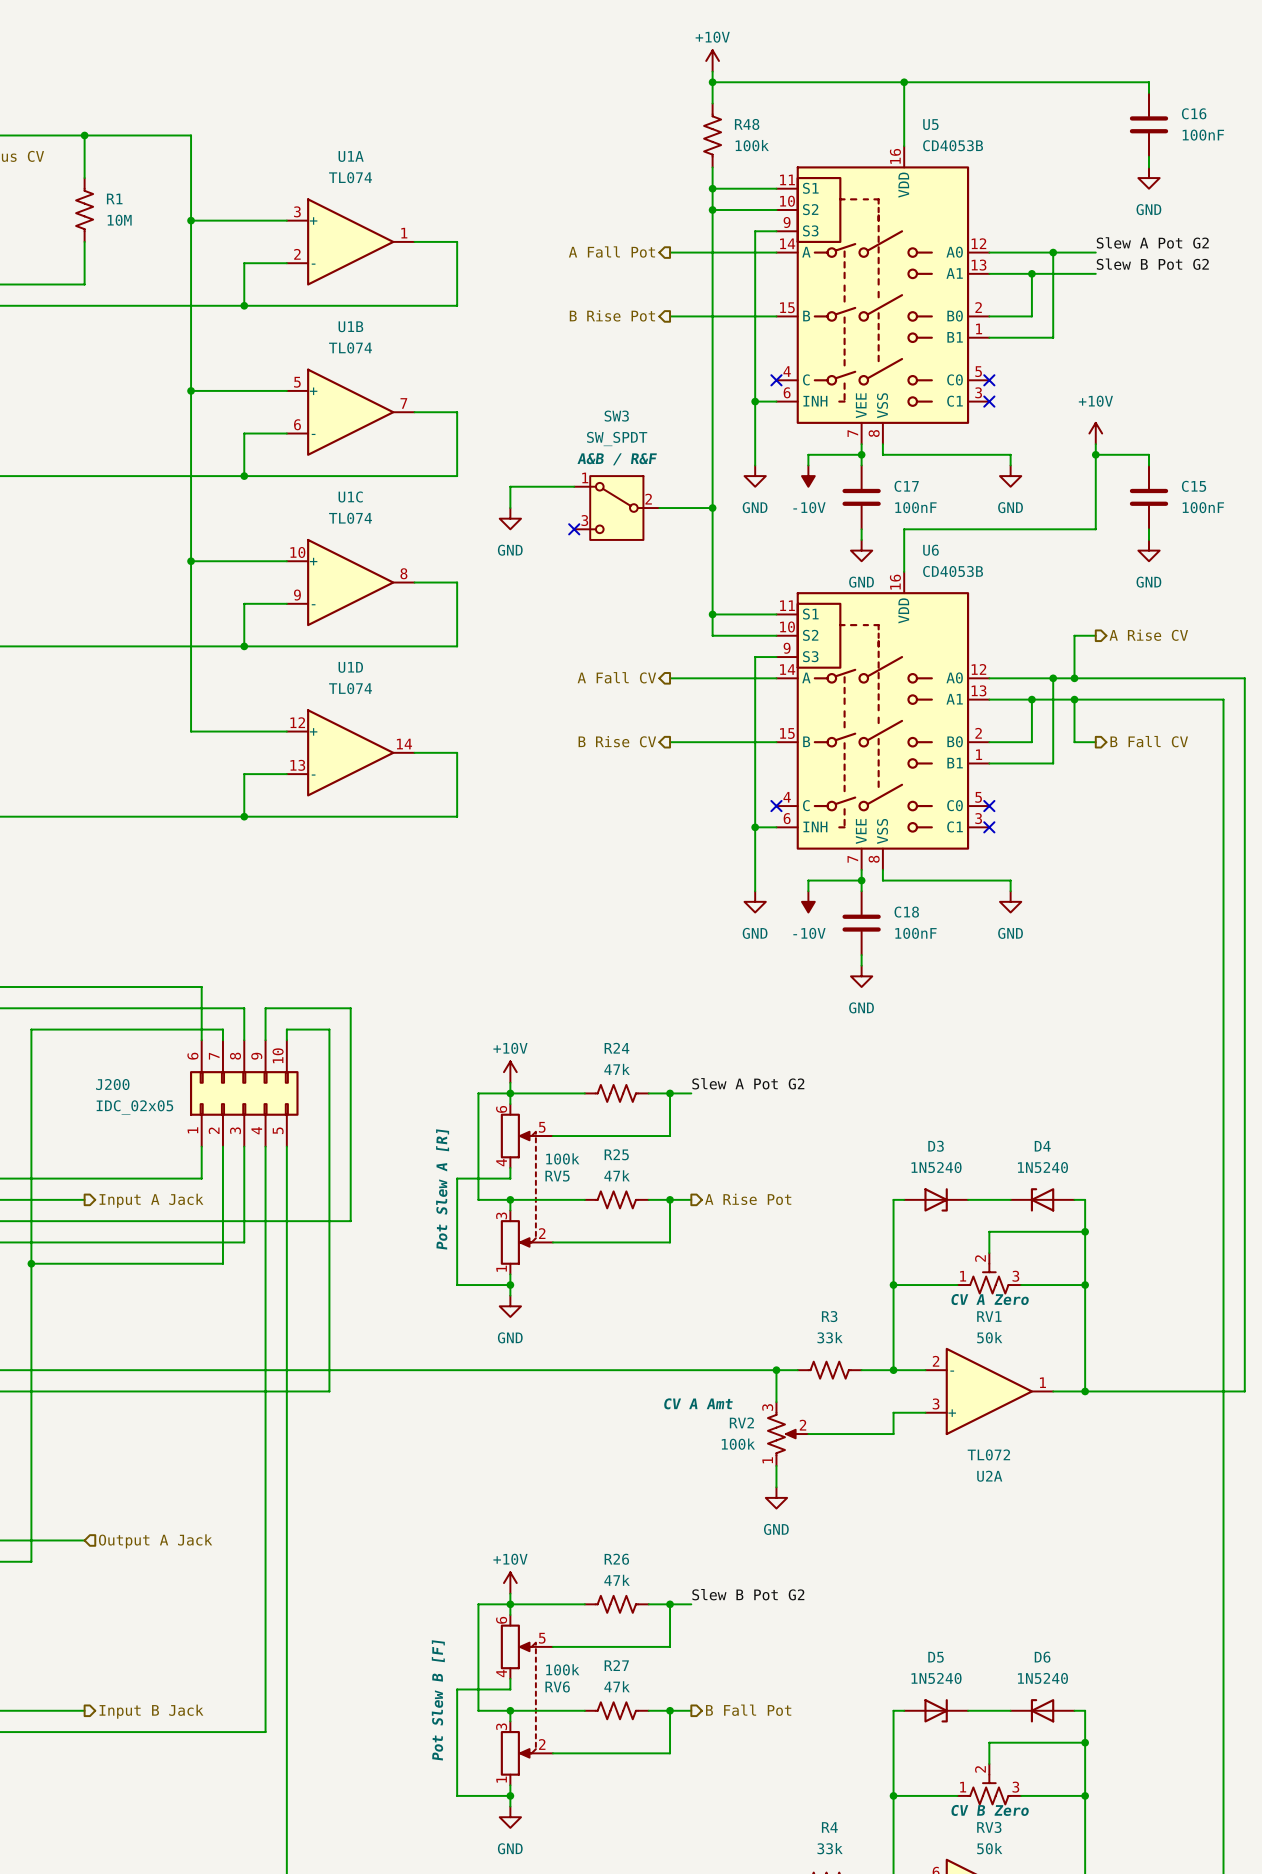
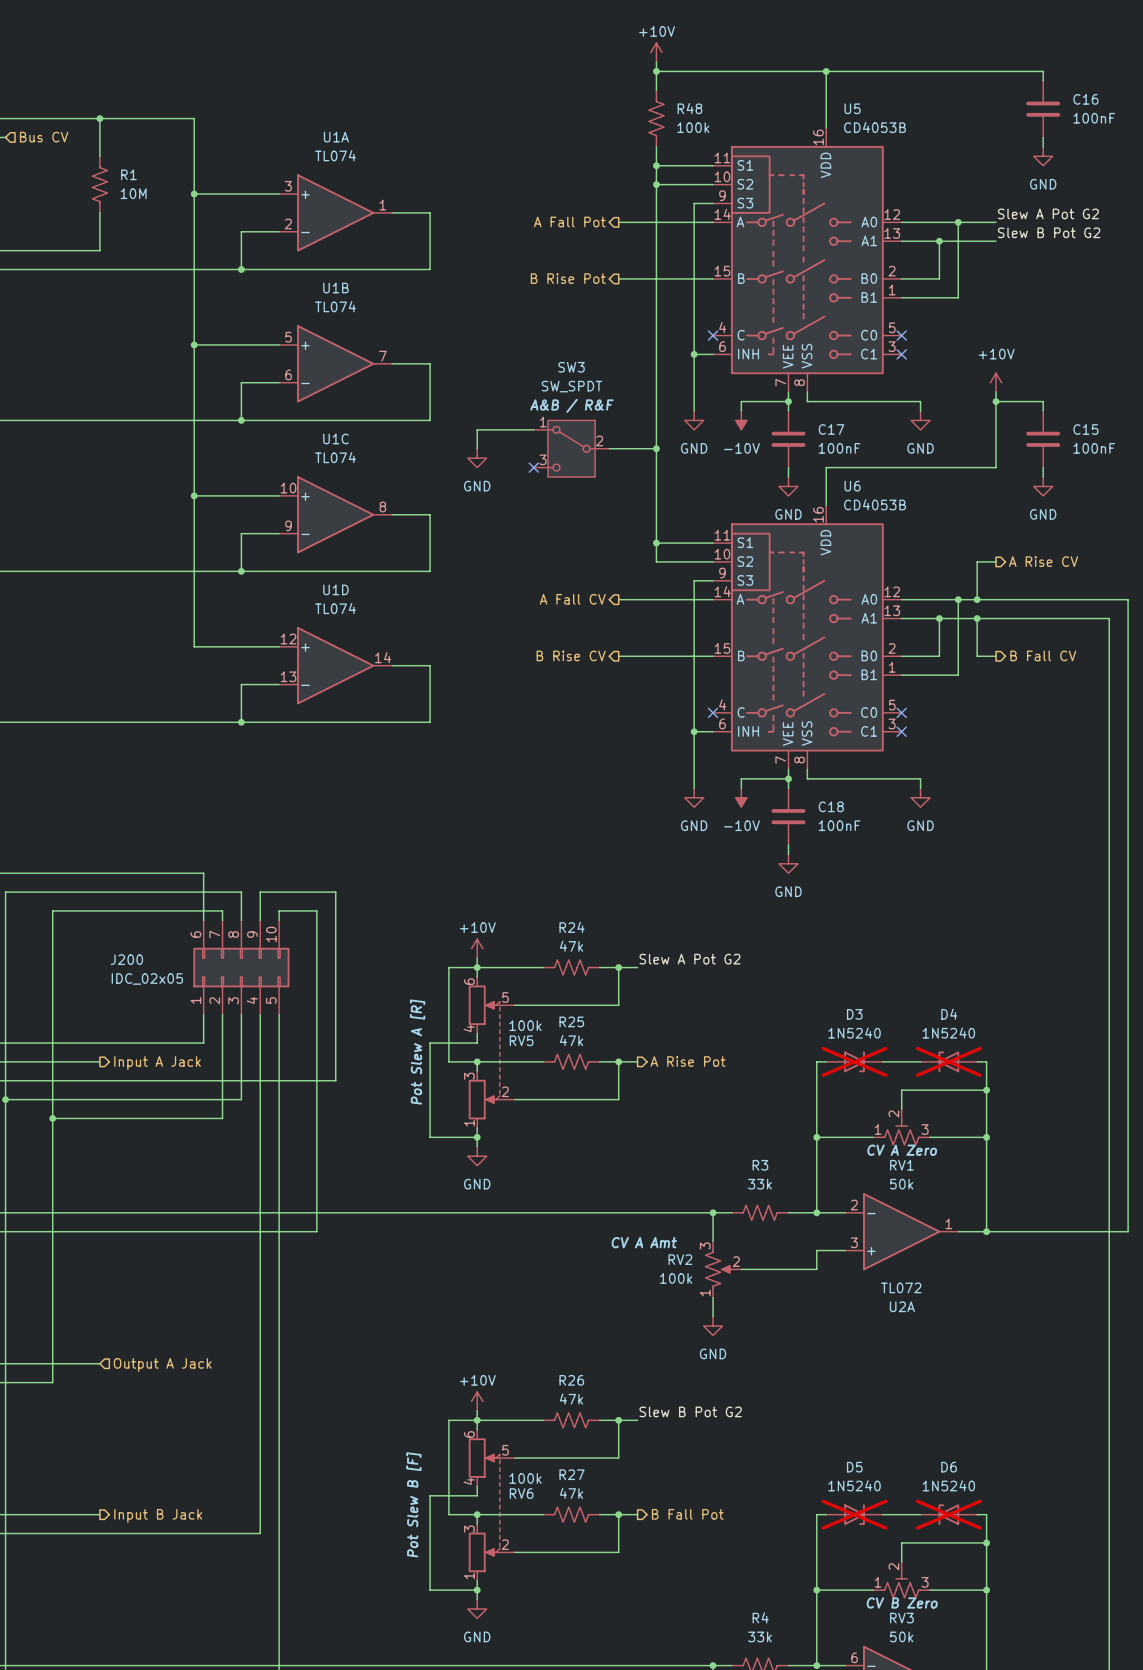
D3 do-not-place cross: none -> (854, 1061)
D4 do-not-place cross: none -> (948, 1061)
D5 do-not-place cross: none -> (854, 1514)
D6 do-not-place cross: none -> (948, 1514)

